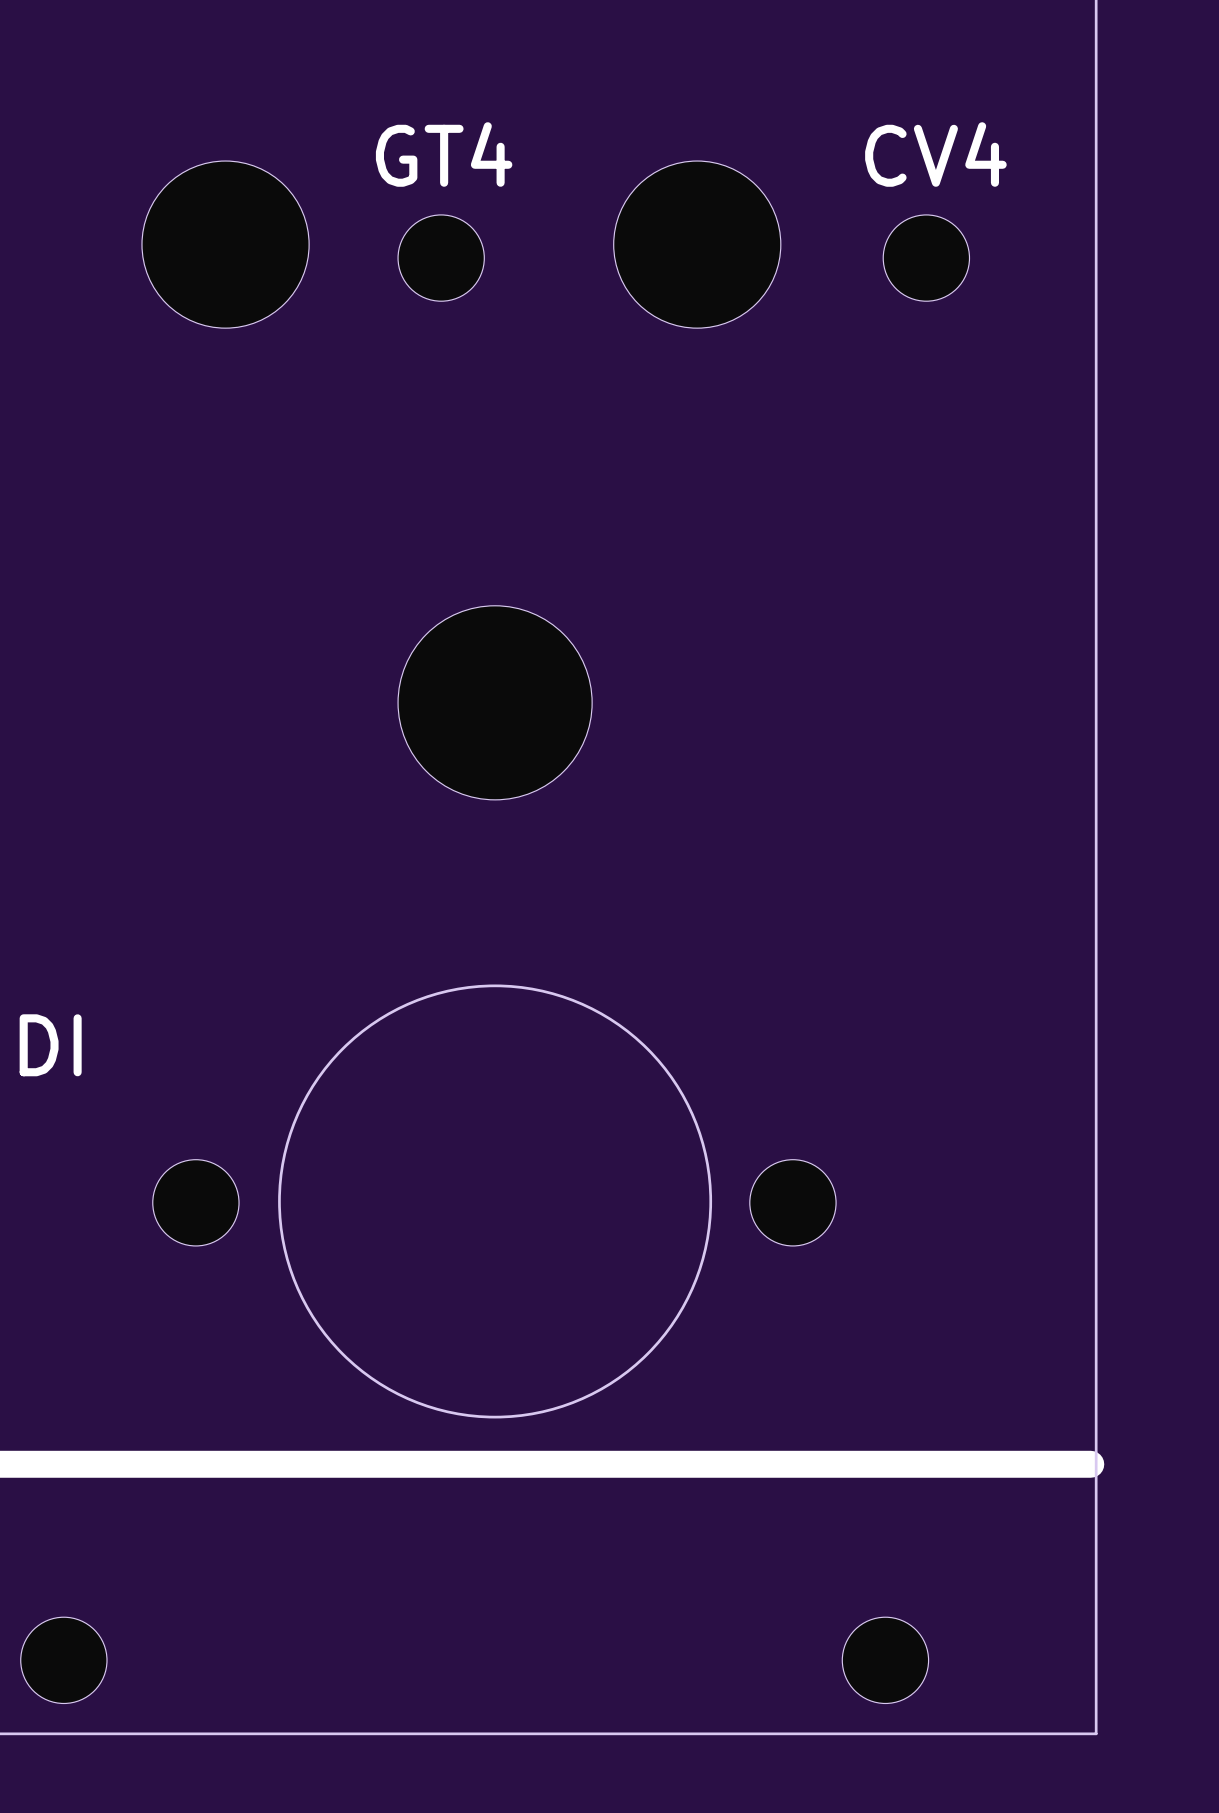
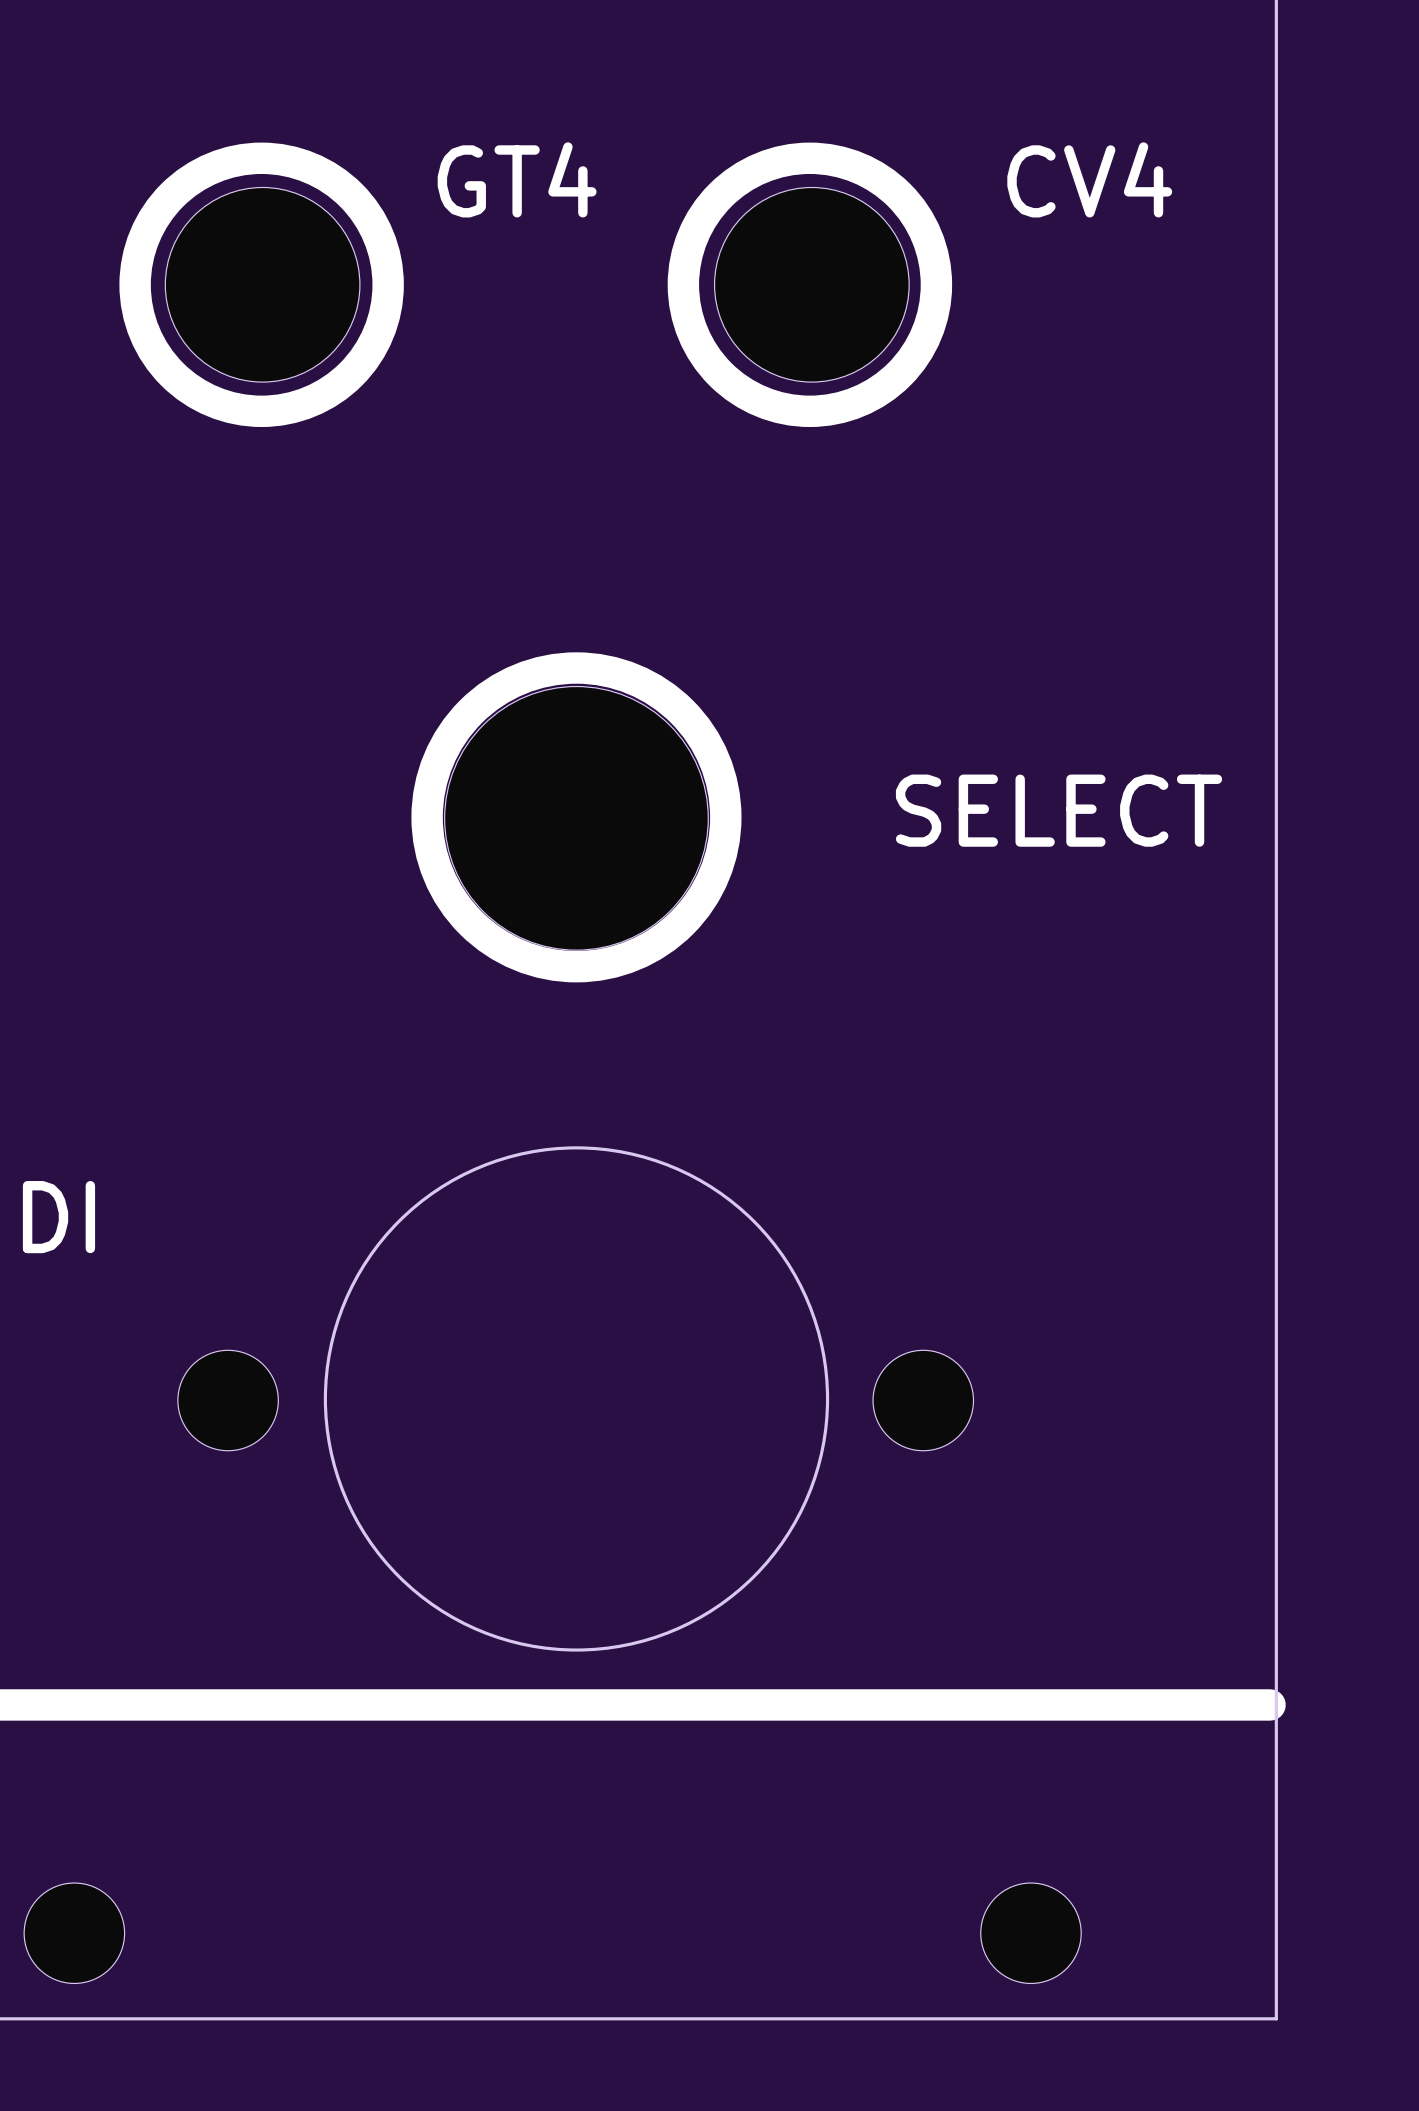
drawing: none -> [119, 142, 404, 428]
drawing: none -> [667, 142, 953, 428]
part: (441, 258) -> none
part: (926, 258) -> none
drawing: none -> [411, 652, 742, 983]
part footprint: [398, 605, 593, 800] -> [444, 686, 709, 951]
text: none -> SELECT (1059, 810)

